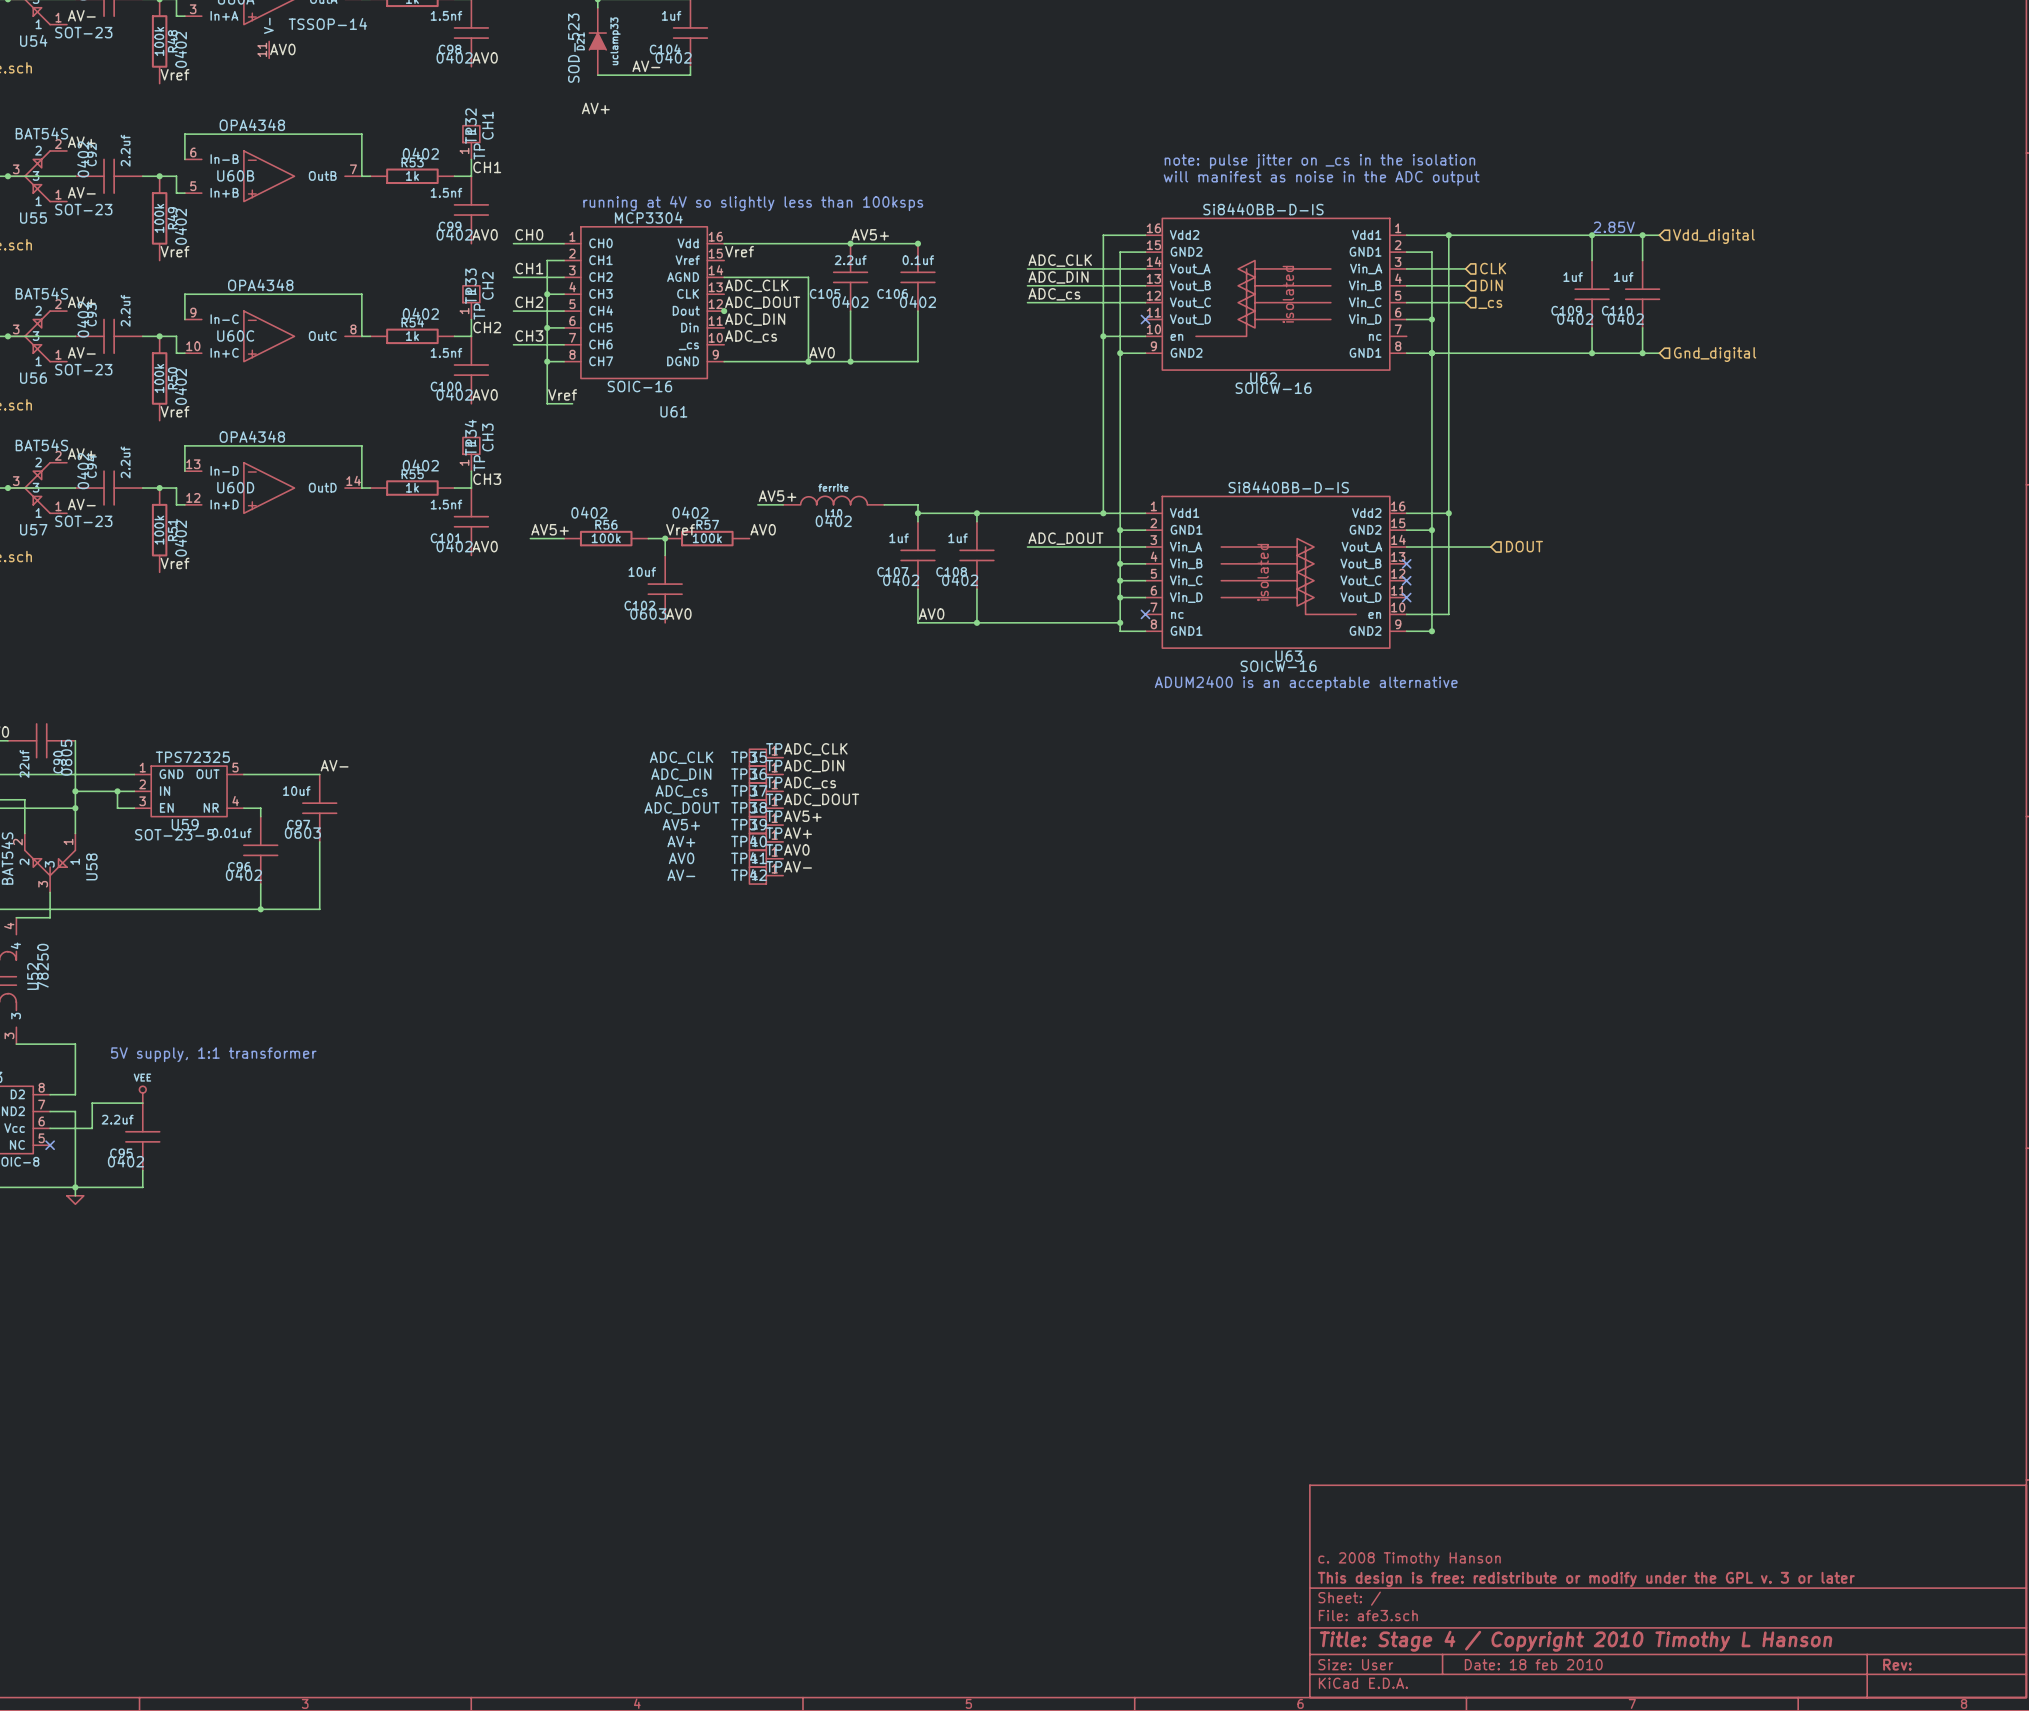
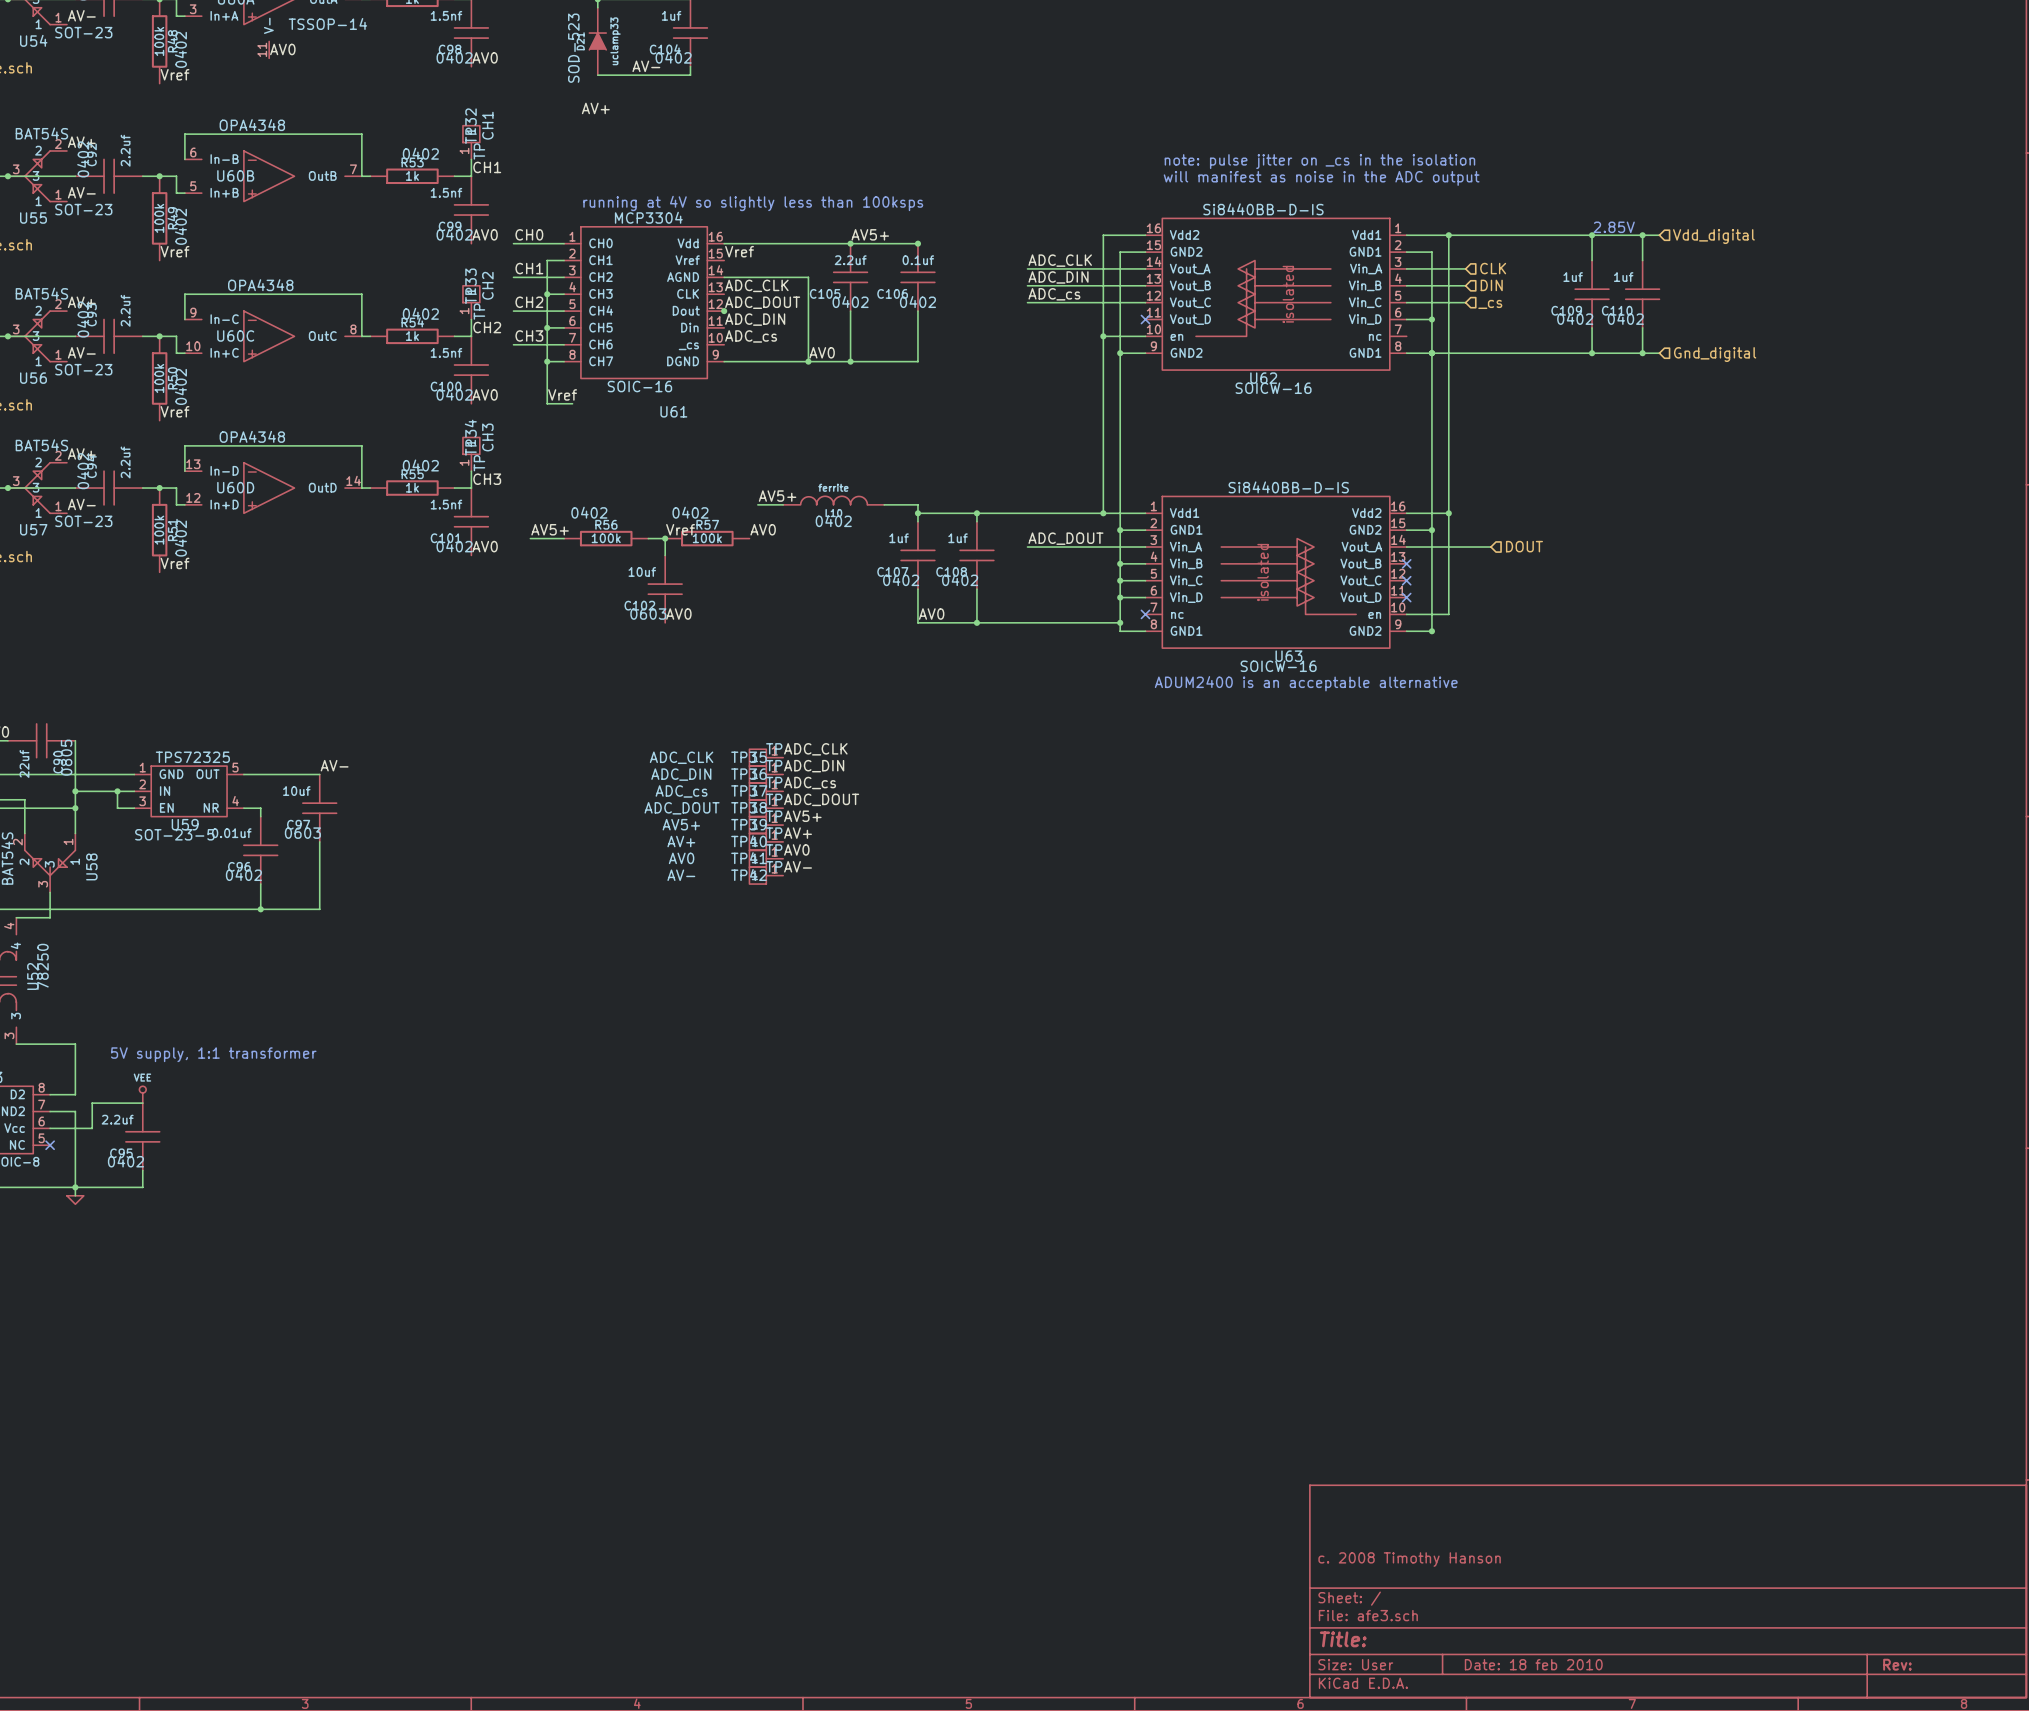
title block: This design is free: redistribute or modify under the GPL v. 3 or later (1586, 1579) -> none
title block: Title: Stage 4 / Copyright 2010 Timothy L Hanson (1576, 1641) -> Title: (1343, 1639)

